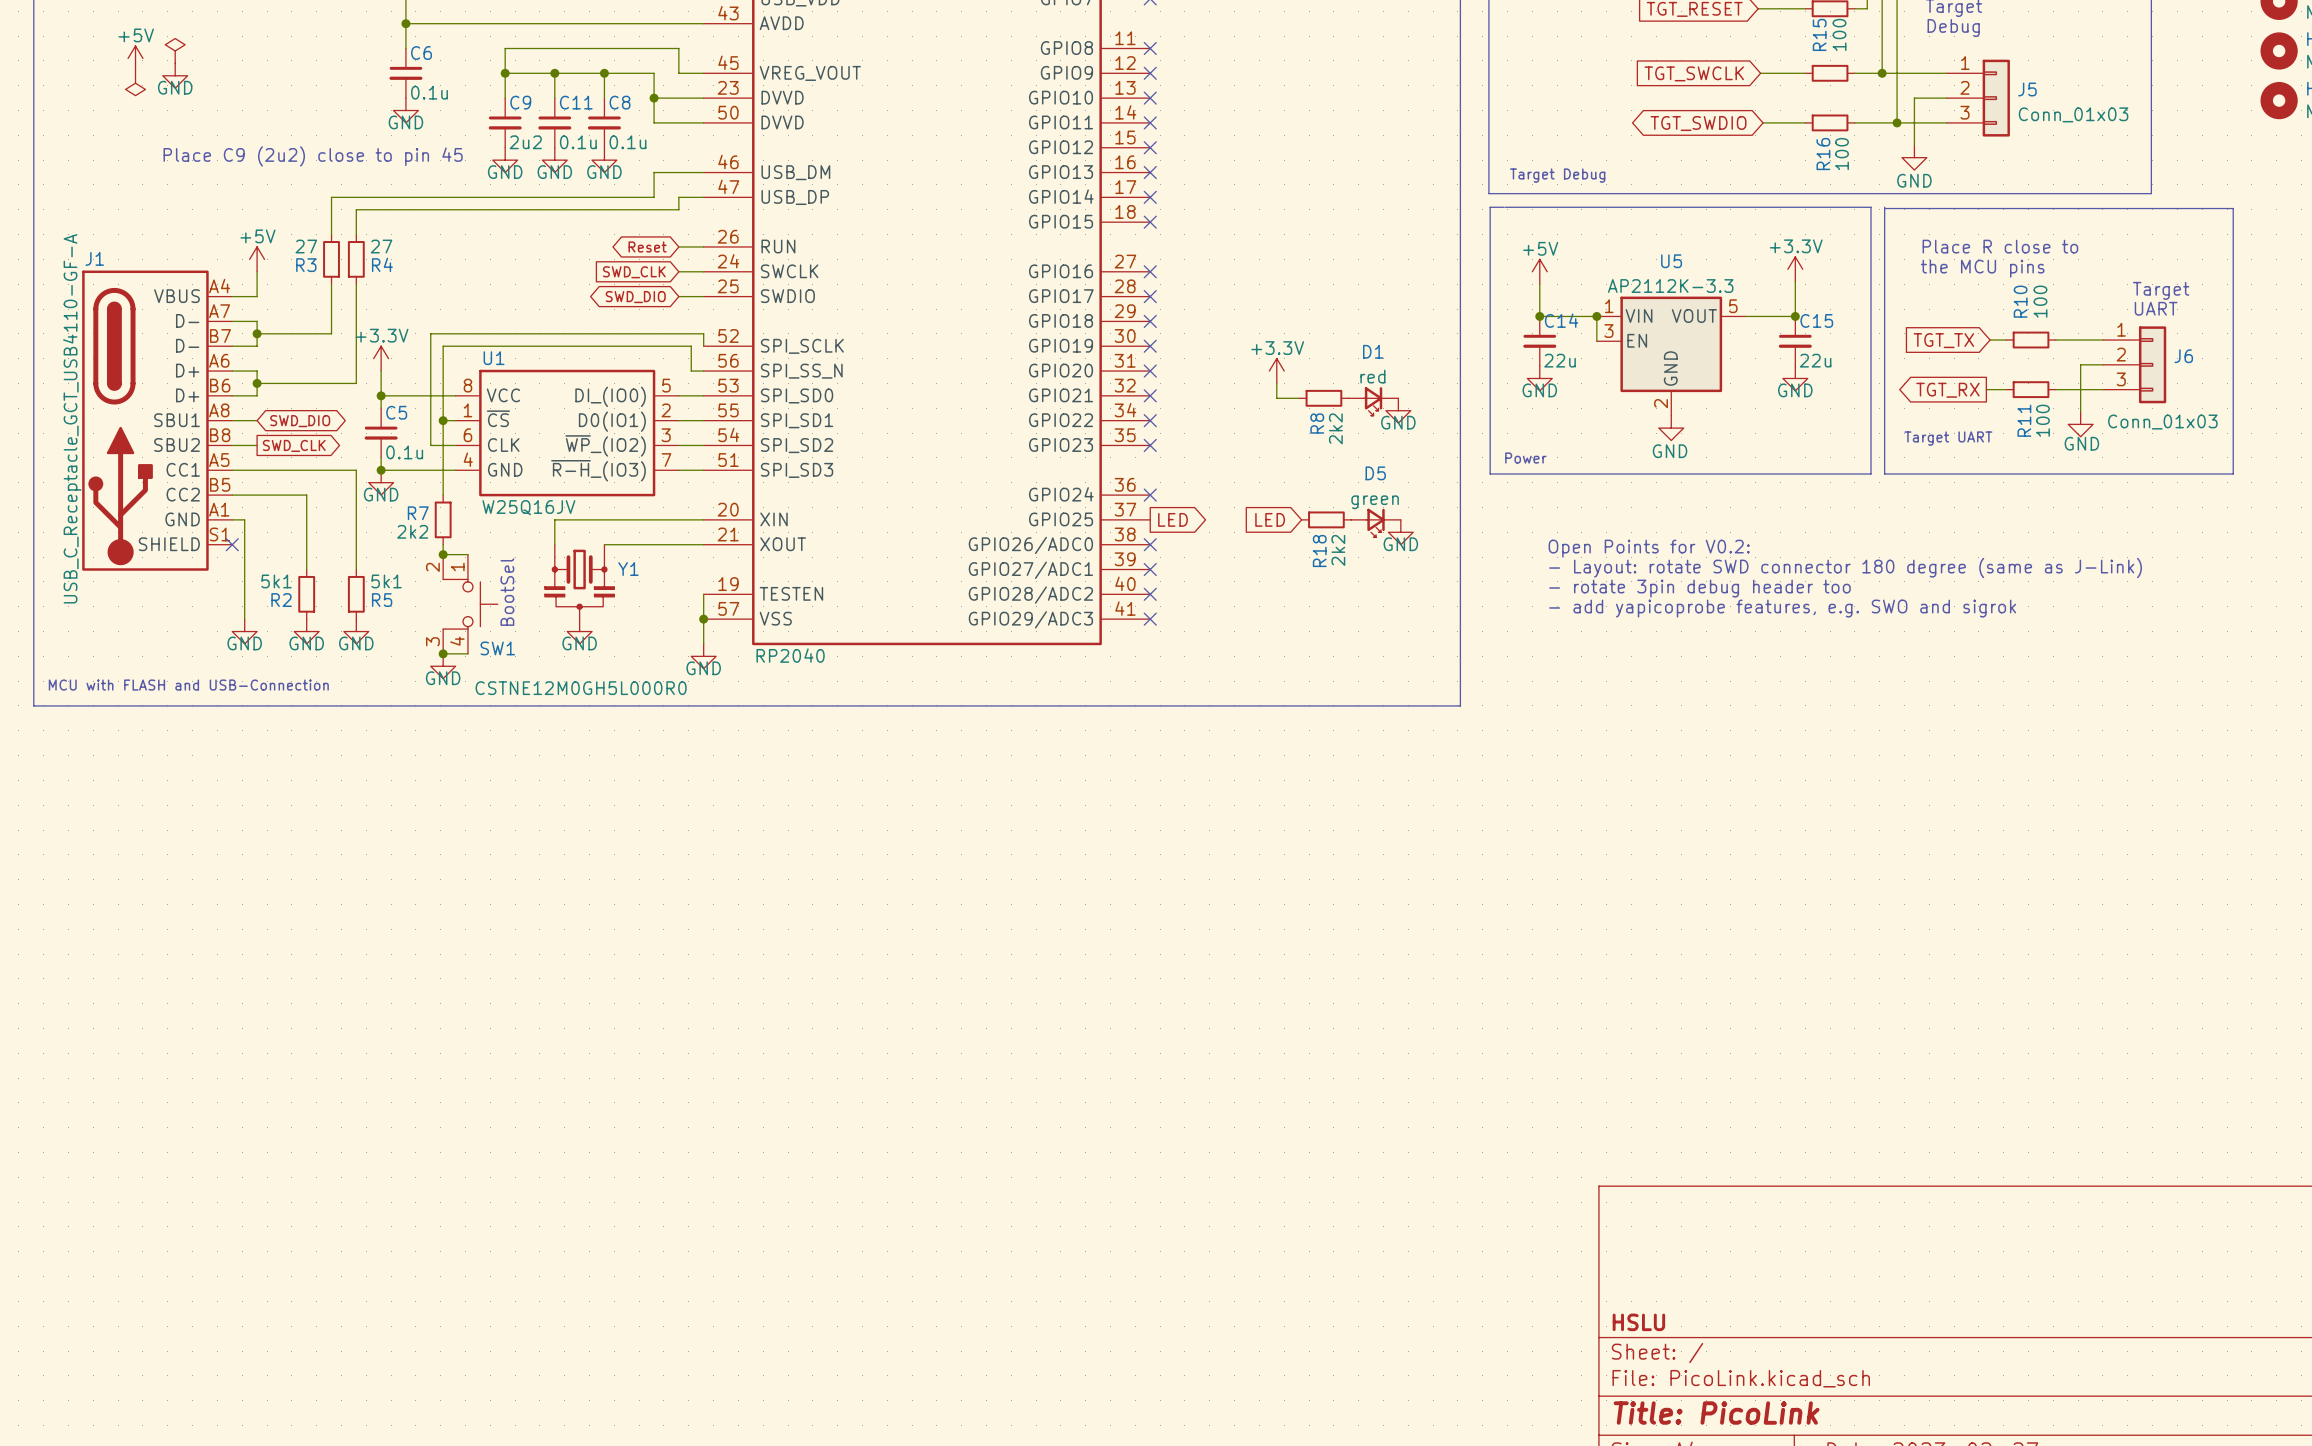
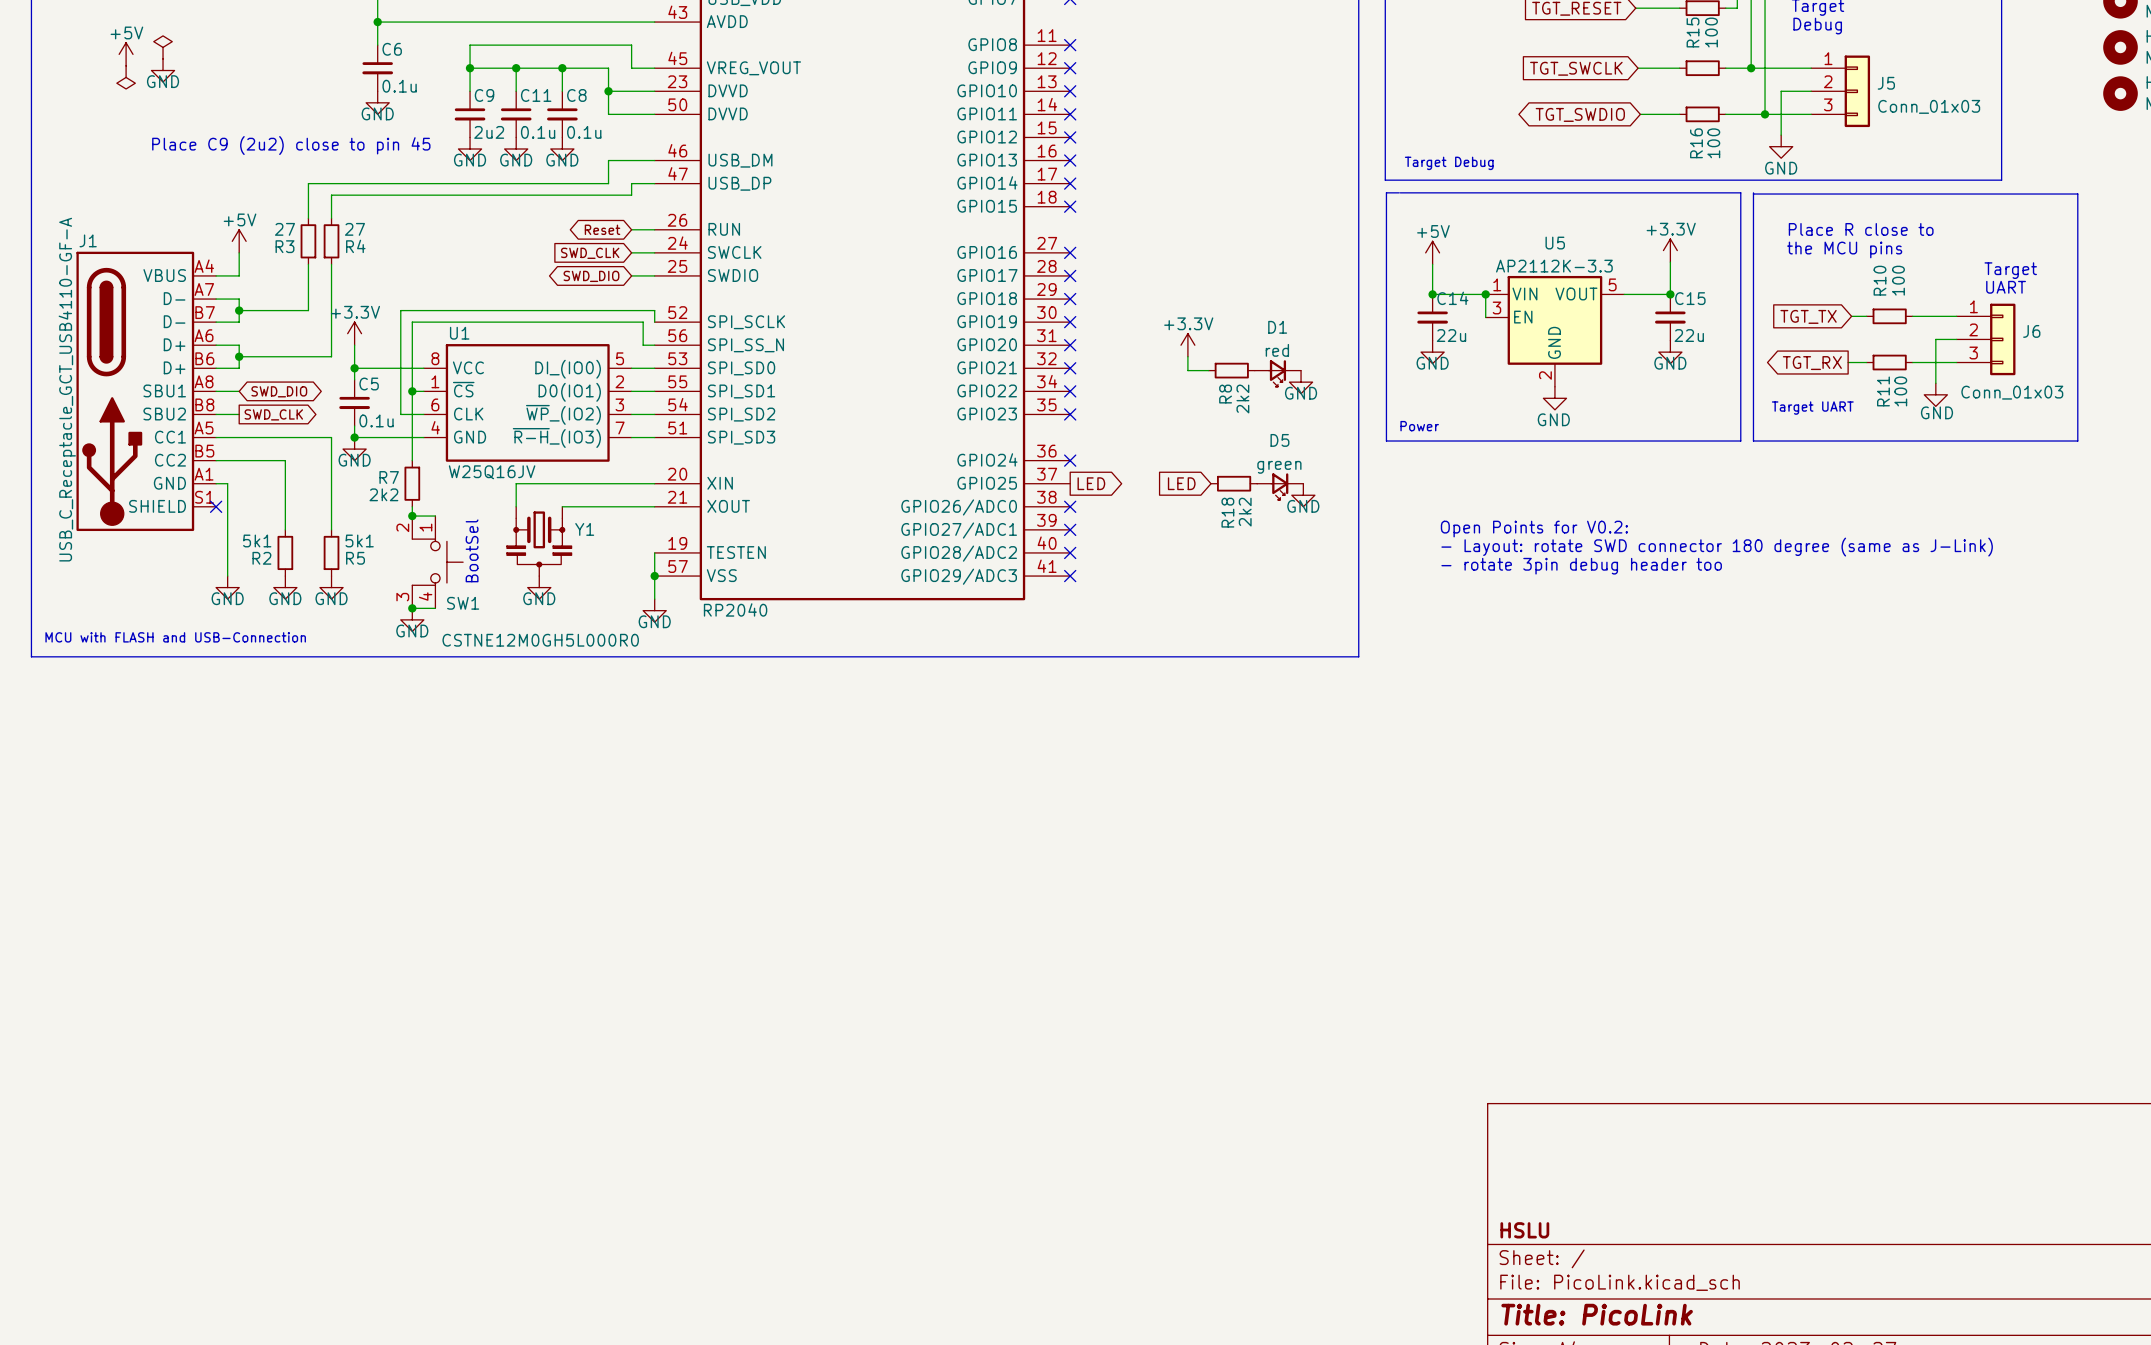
text: Open Points for V0.2: (1649, 548) -> none
text: - Layout: rotate SWD connector 180 degree (same as J-Link) (1845, 568) -> Open Points for V0.2: (1534, 529)
text: - rotate 3pin debug header too (1699, 588) -> - Layout: rotate SWD connector 180 degree (same as J-Link) (1717, 547)
text: - add yapicoprobe features, e.g. SWO and sigrok (1782, 608) -> - rotate 3pin debug header too (1581, 566)

